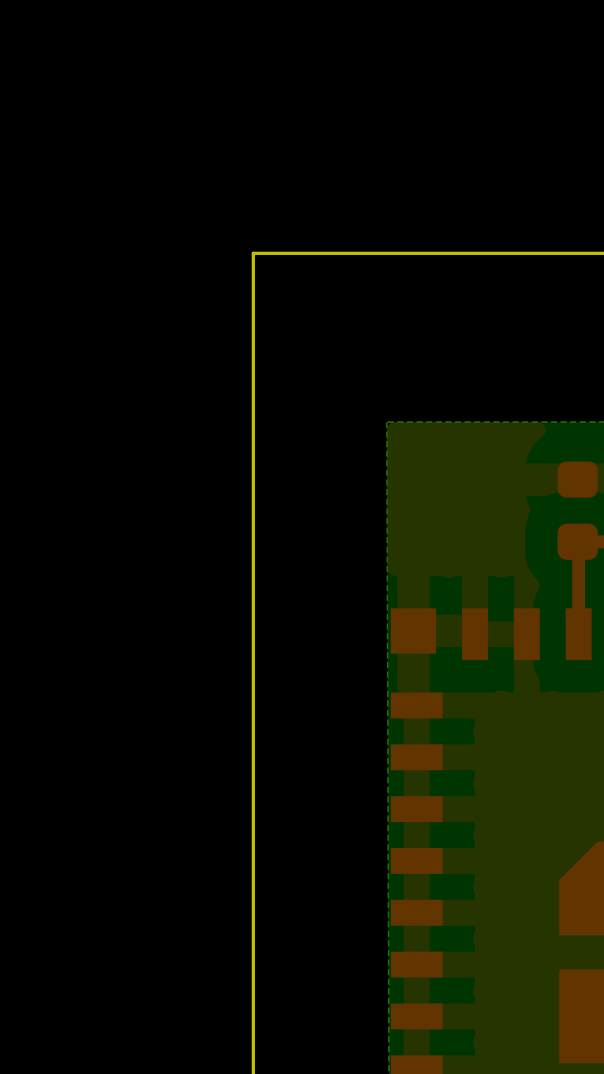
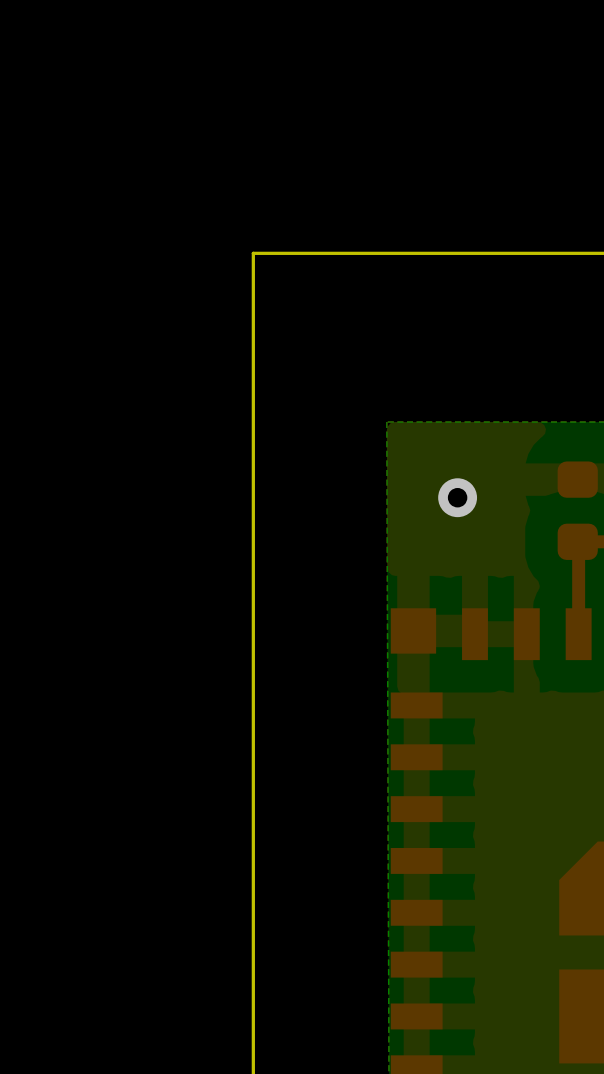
via: none -> (457, 497)

